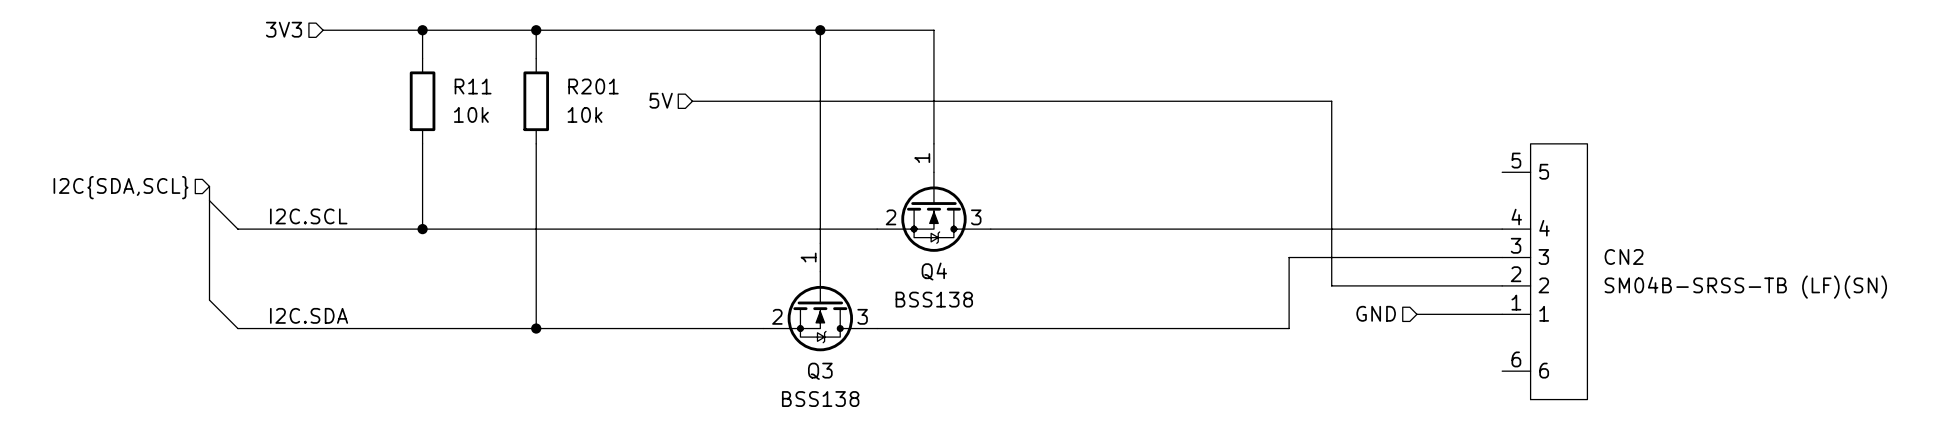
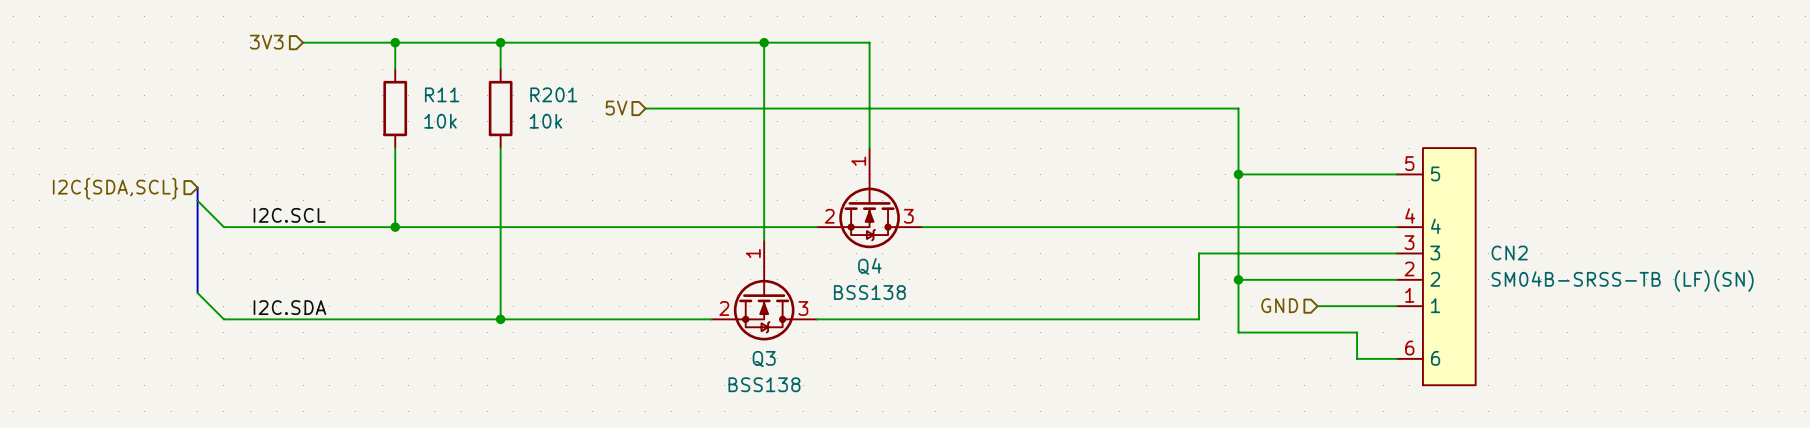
wire: none -> (1238, 174) (1396, 174)
junction: none -> (1238, 174)
wire: none -> (1238, 279) (1238, 332) (1357, 332) (1357, 358) (1396, 358)
junction: none -> (1238, 279)

